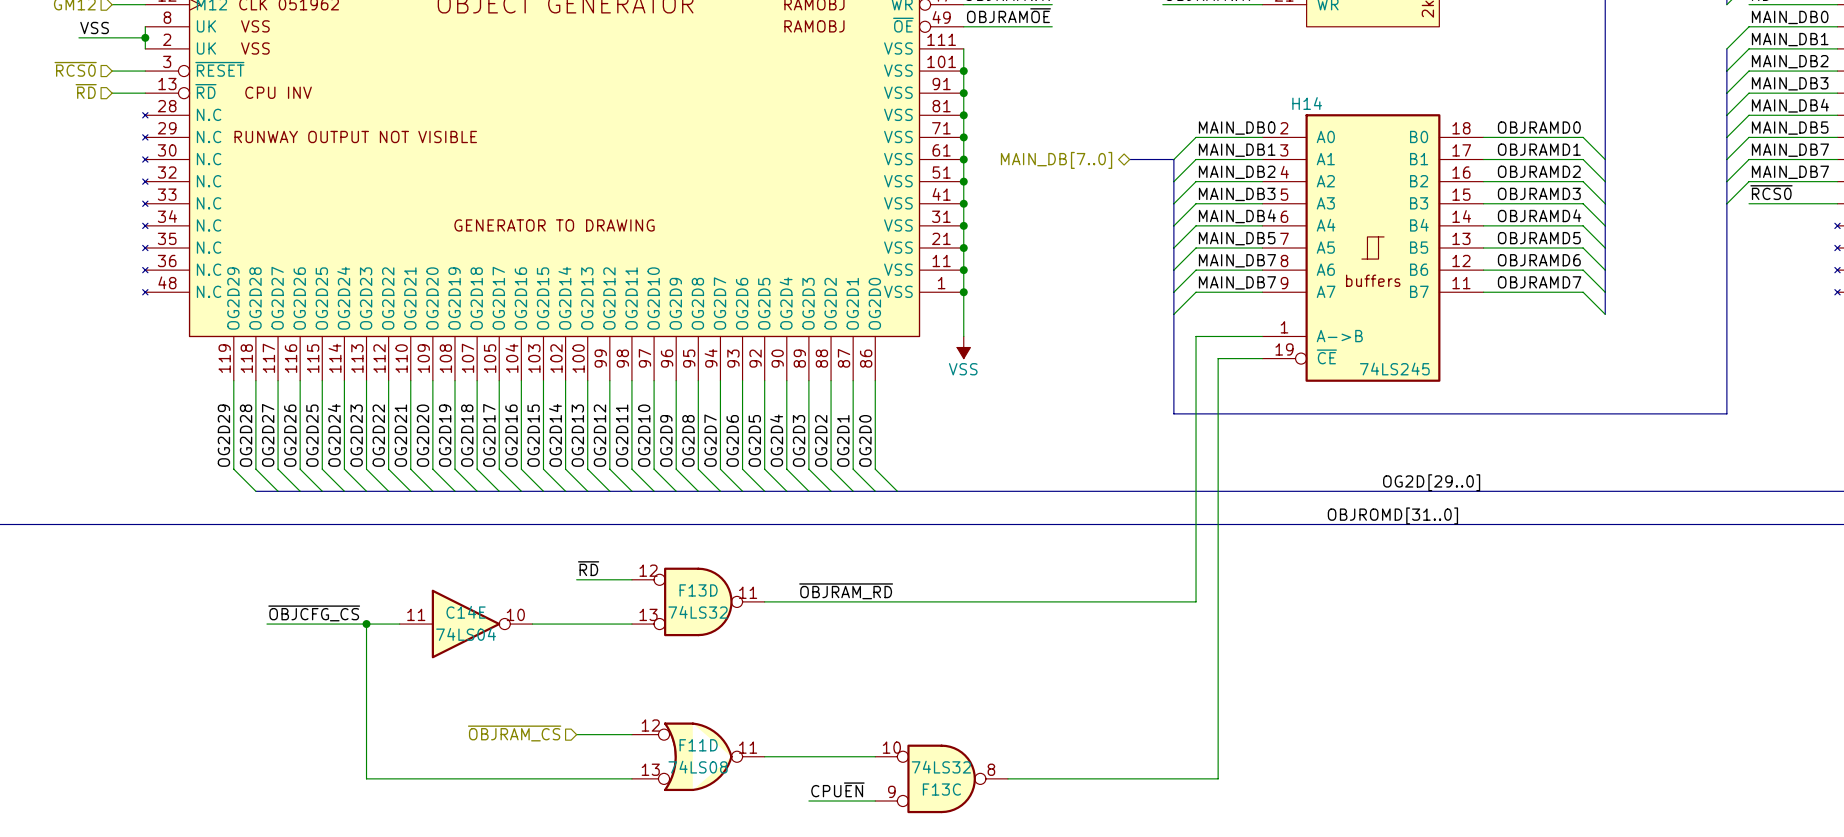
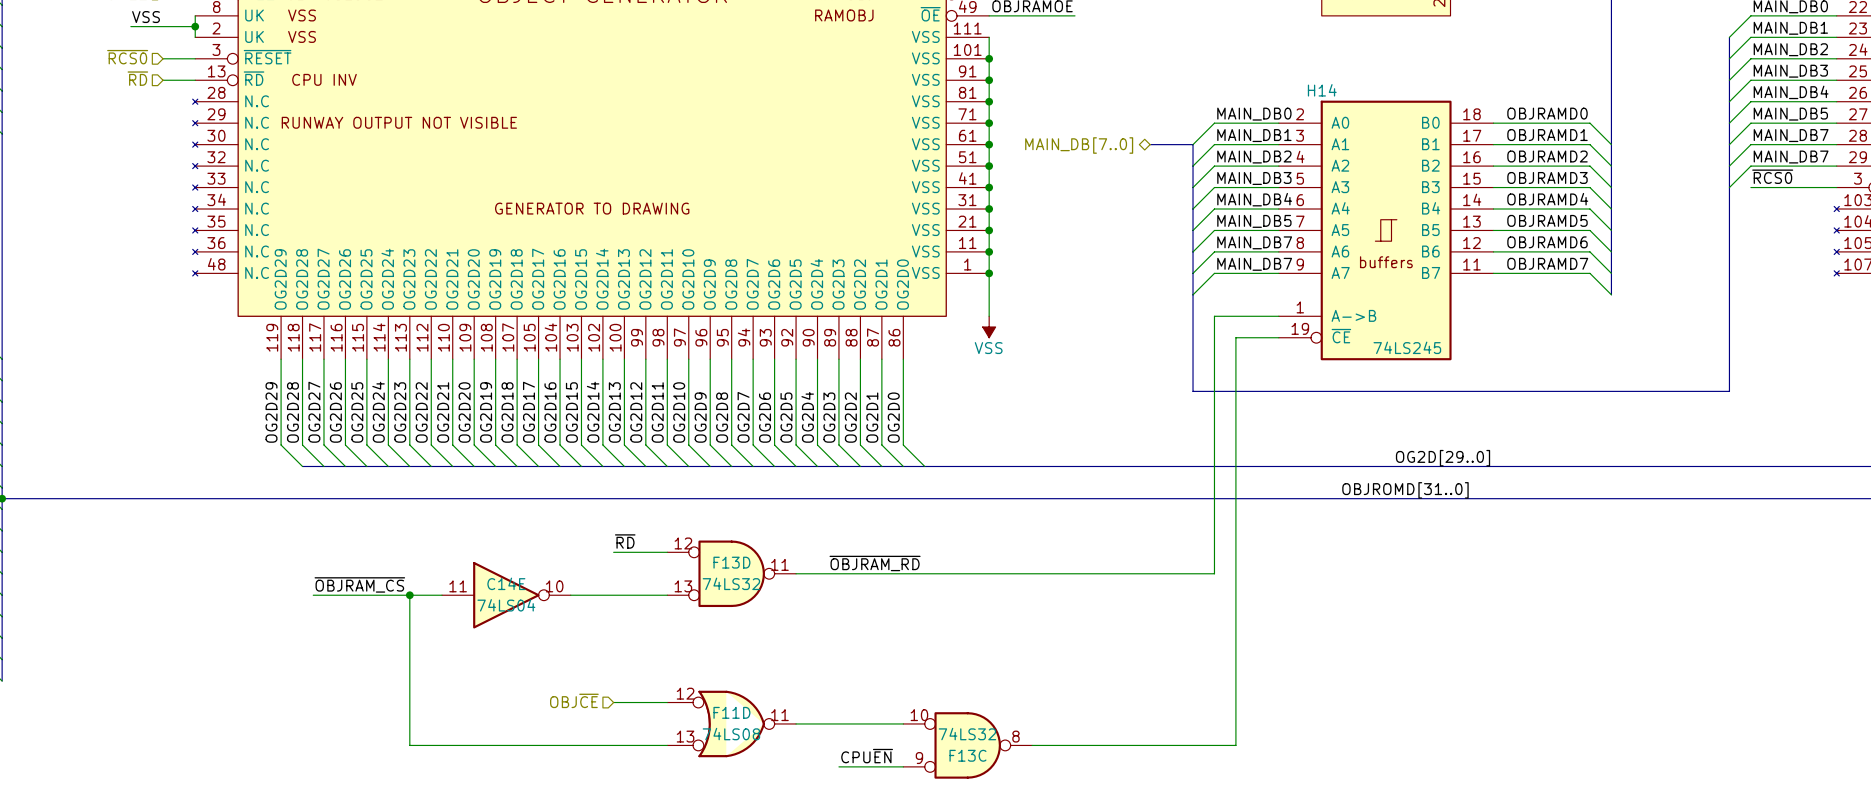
label: ~{OBJCFG_CS} (314, 613) -> ~{OBJRAM_CS} (359, 584)
hierarchical label: ~{OBJRAM_CS} (514, 733) -> OBJ~{CE} (574, 700)

